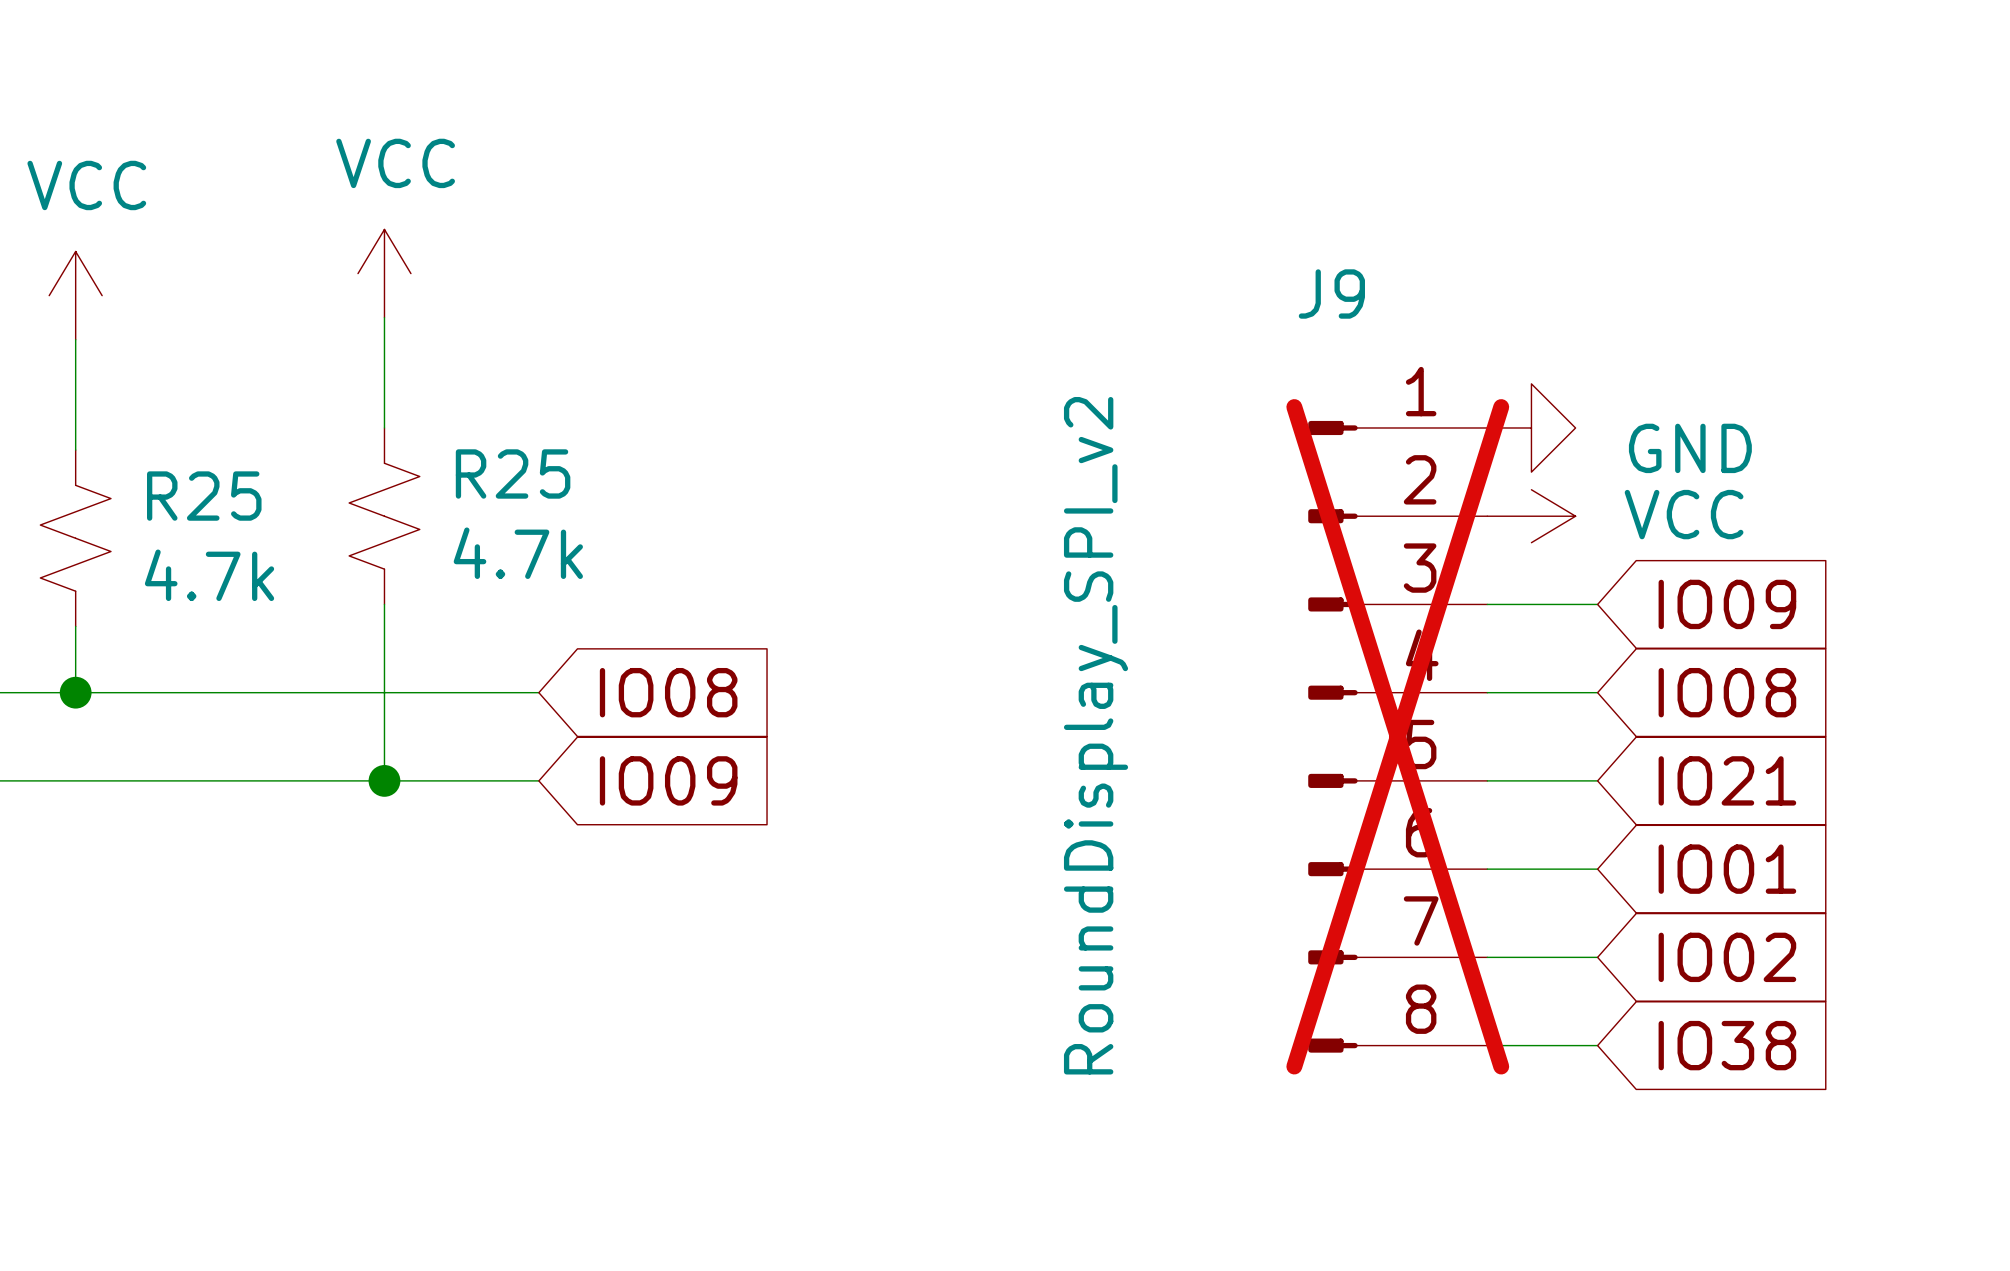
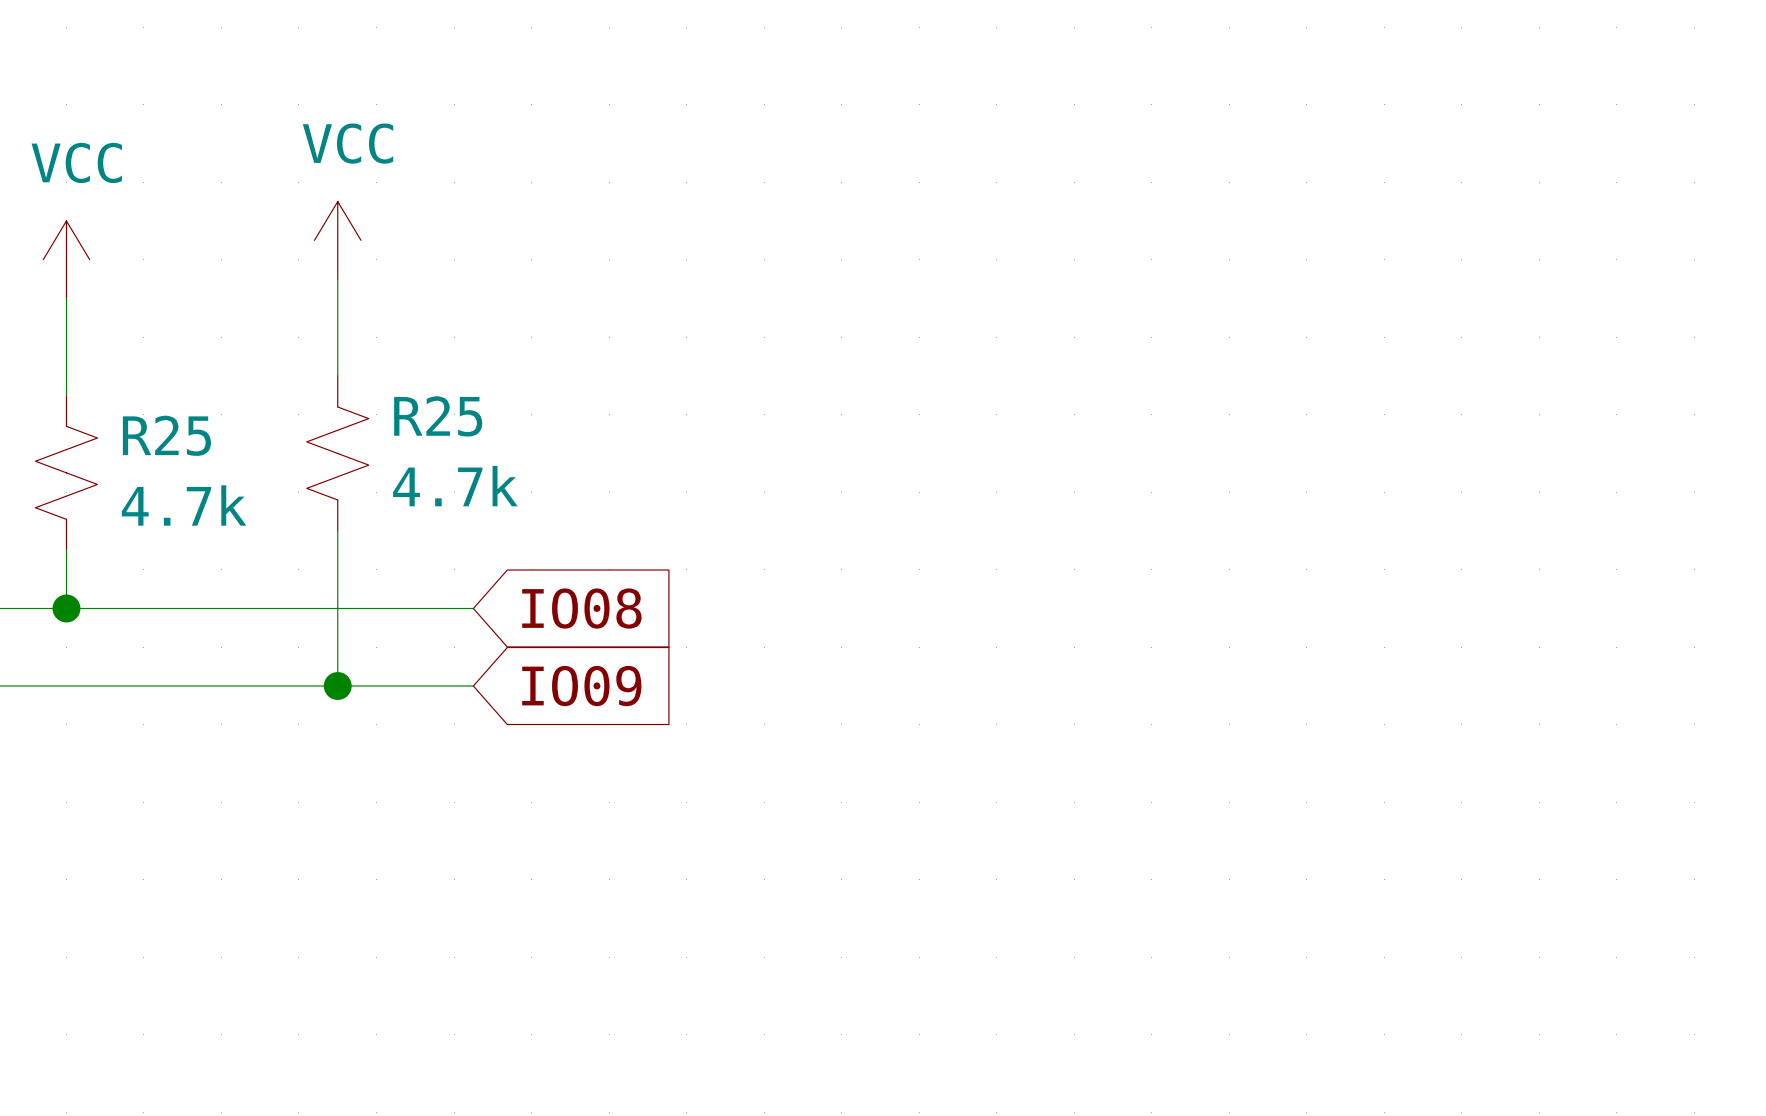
power symbol: GND (1531, 427) -> none
power symbol: VCC (1531, 516) -> none
wire: (1487, 604) (1597, 604) -> none
global label: IO09 (1727, 604) -> none
wire: (1487, 692) (1597, 692) -> none
global label: IO08 (1727, 692) -> none
J9: RoundDisplay_SPI_v2 (1397, 736) -> none
wire: (1487, 780) (1597, 780) -> none
global label: IO21 (1727, 780) -> none
wire: (1487, 869) (1597, 869) -> none
global label: IO01 (1727, 869) -> none
wire: (1487, 957) (1597, 957) -> none
global label: IO02 (1727, 957) -> none
wire: (1487, 1045) (1597, 1045) -> none
global label: IO38 (1727, 1045) -> none

